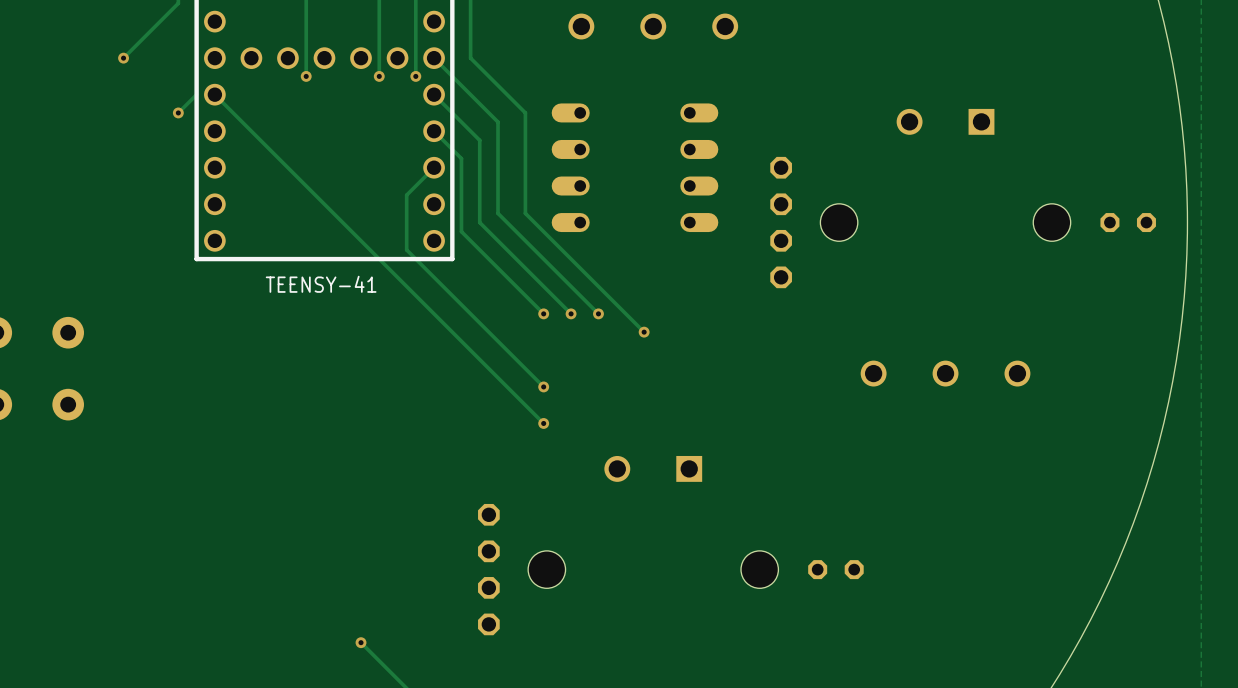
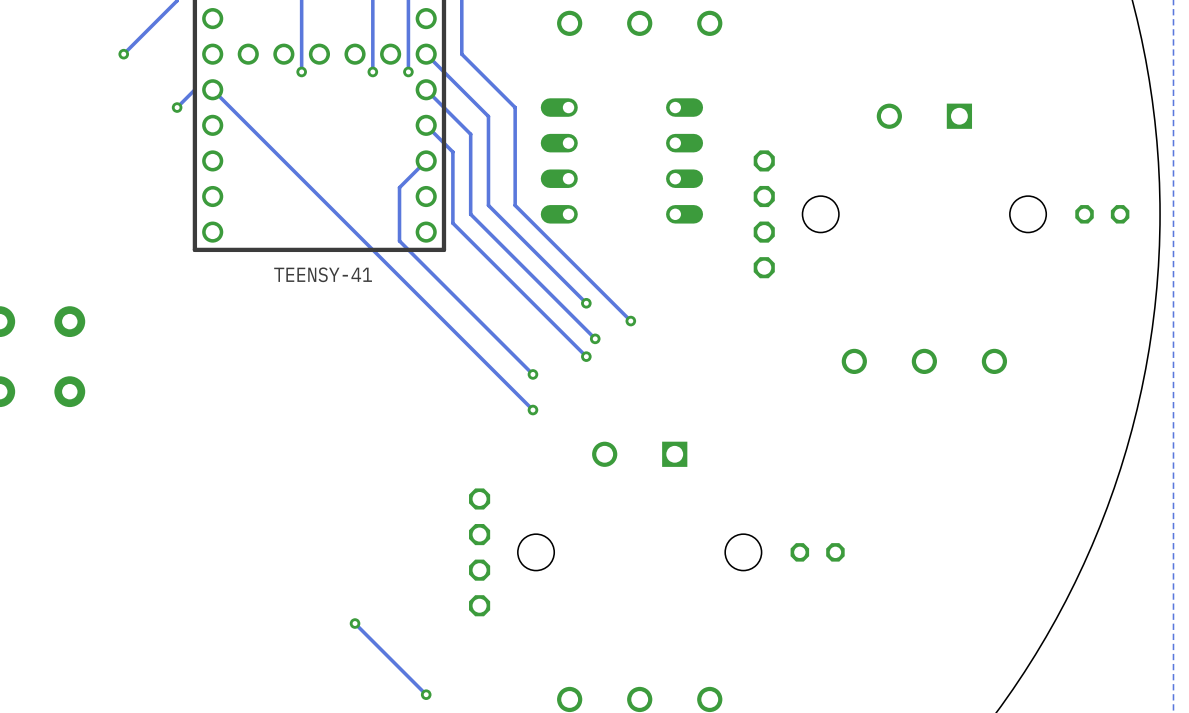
track: none -> (532, 303) (586, 356)
via: (543, 313) -> none
track: none -> (559, 303) (595, 338)
via: (571, 313) -> none
via: none -> (595, 338)
via: none -> (586, 356)

